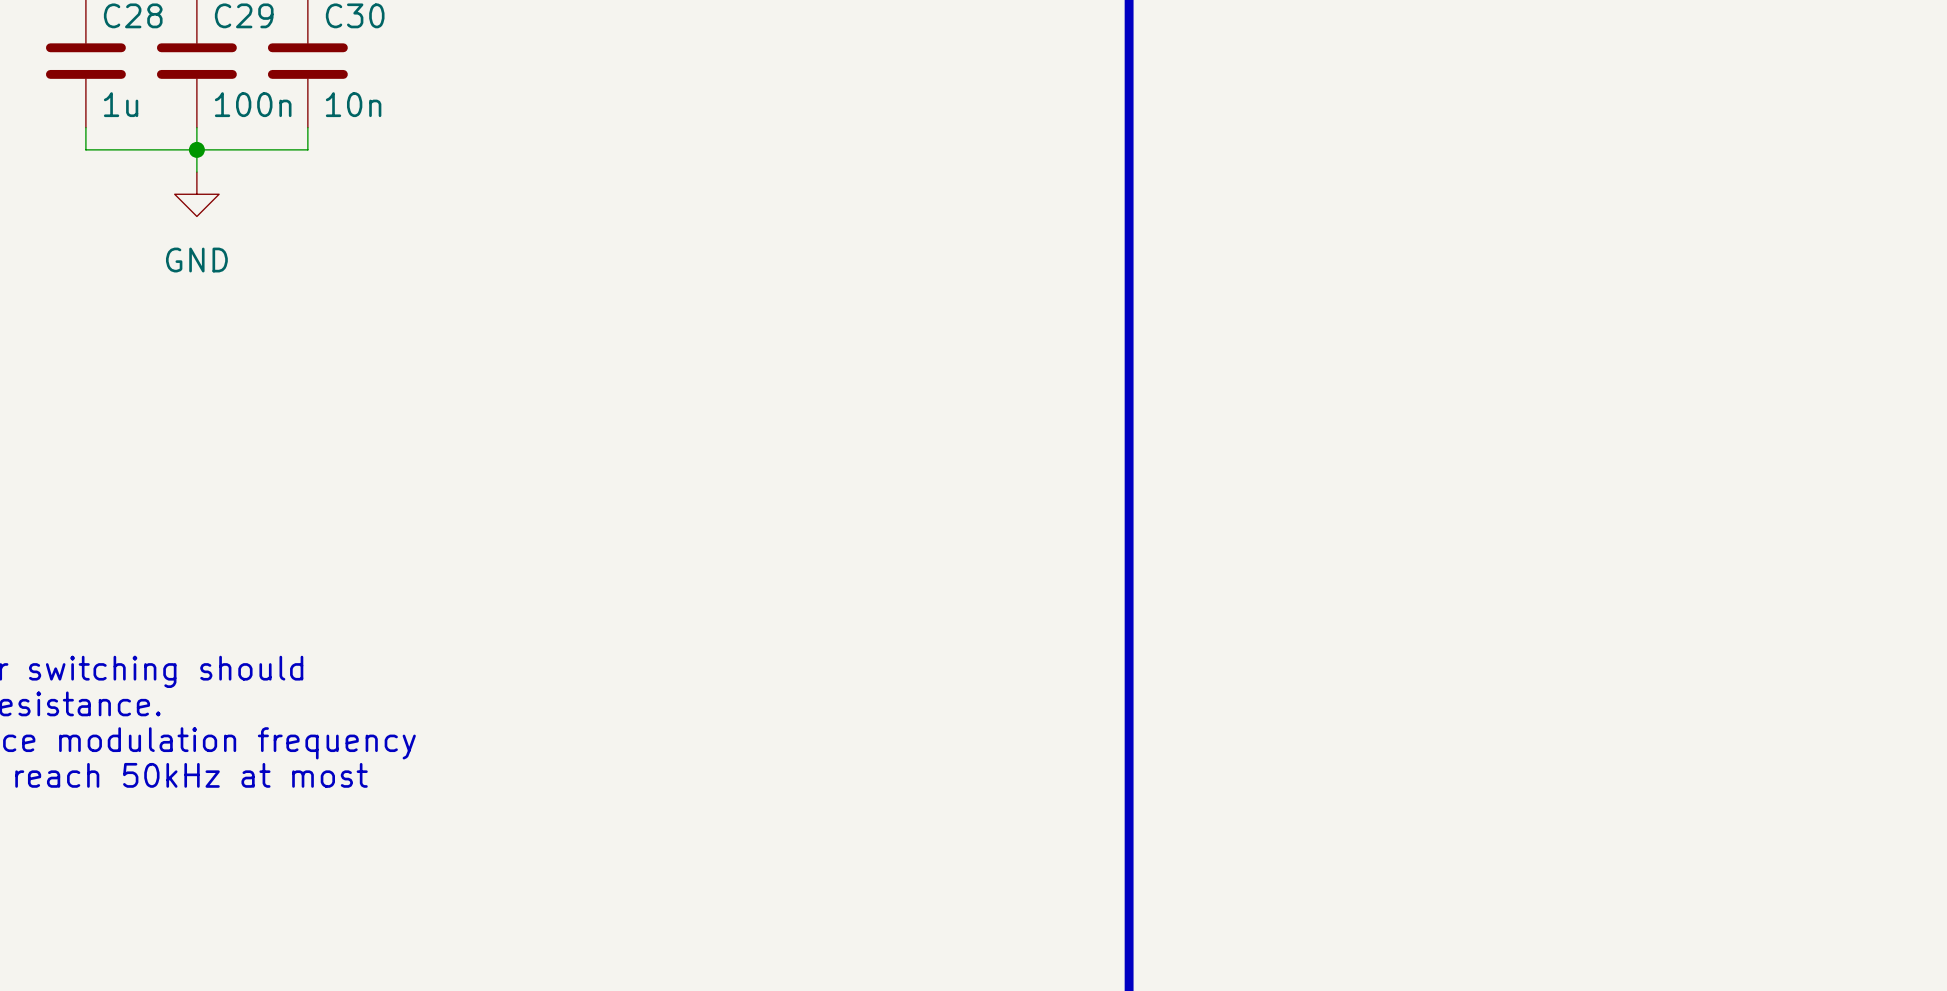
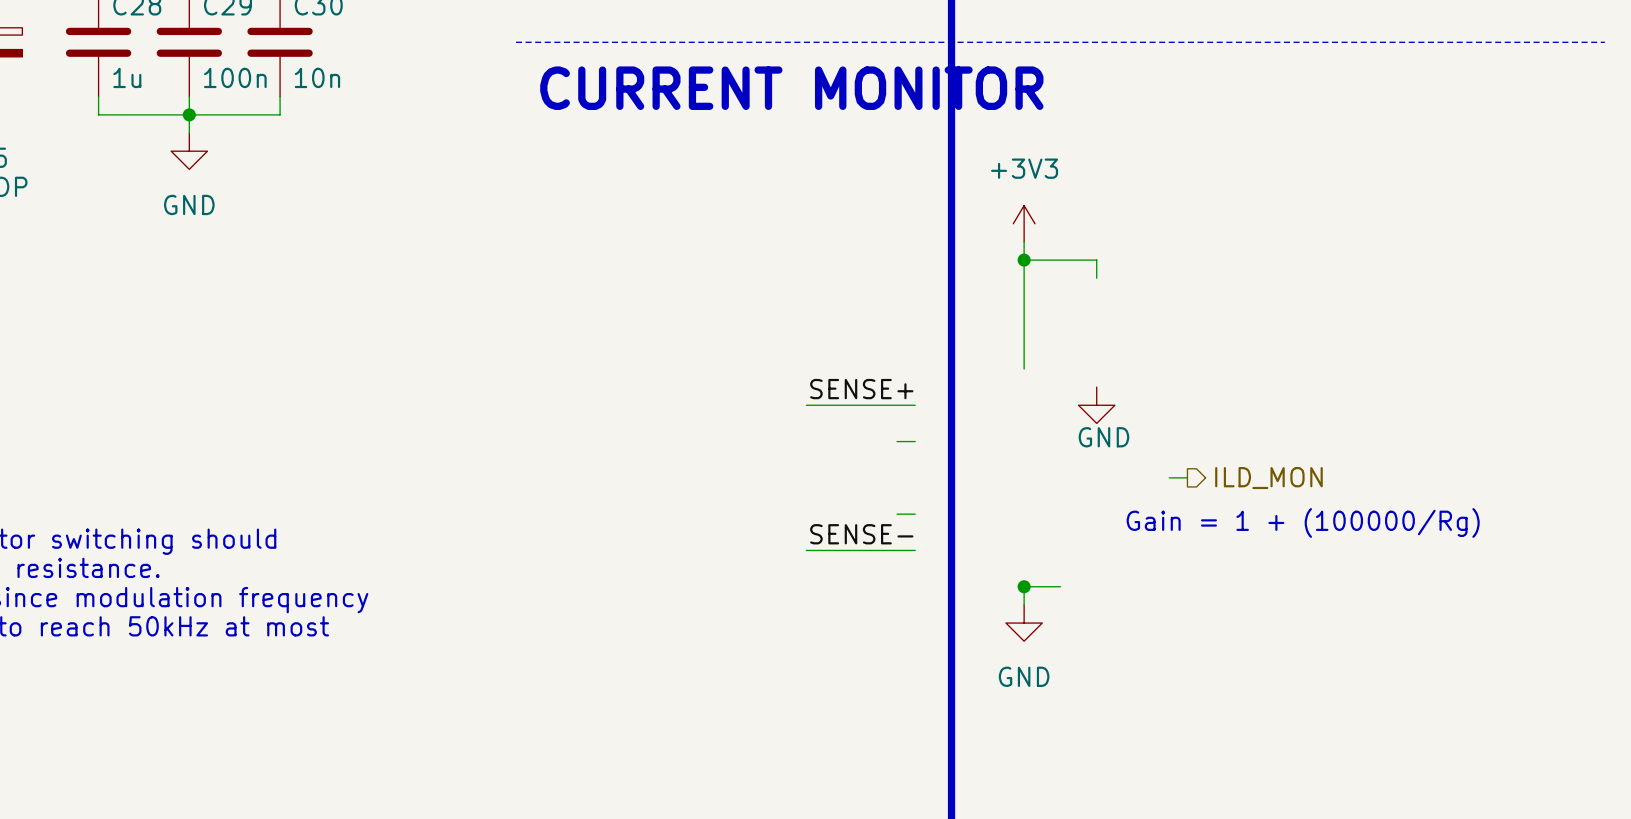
line: none -> (515, 42) (1604, 42)
text: none -> CURRENT MONITOR (791, 88)
power symbol: none -> +3V3 (1024, 223)
wire: none -> (1024, 241) (1024, 368)
wire: none -> (1024, 260) (1096, 260) (1096, 278)
junction: none -> (1024, 260)
label: none -> SENSE+ (861, 389)
wire: none -> (806, 405) (915, 405)
power symbol: none -> GND (1096, 405)
wire: none -> (897, 441) (915, 441)
wire: none -> (1169, 477) (1187, 477)
hierarchical label: none -> ILD_MON (1268, 478)
wire: none -> (897, 514) (915, 514)
text: none -> Gain = 1 + (100000/Rg) (1303, 522)
label: none -> SENSE- (861, 534)
wire: none -> (806, 550) (915, 550)
junction: none -> (1024, 586)
wire: none -> (1060, 586) (1024, 586) (1024, 604)
power symbol: none -> GND (1024, 623)

